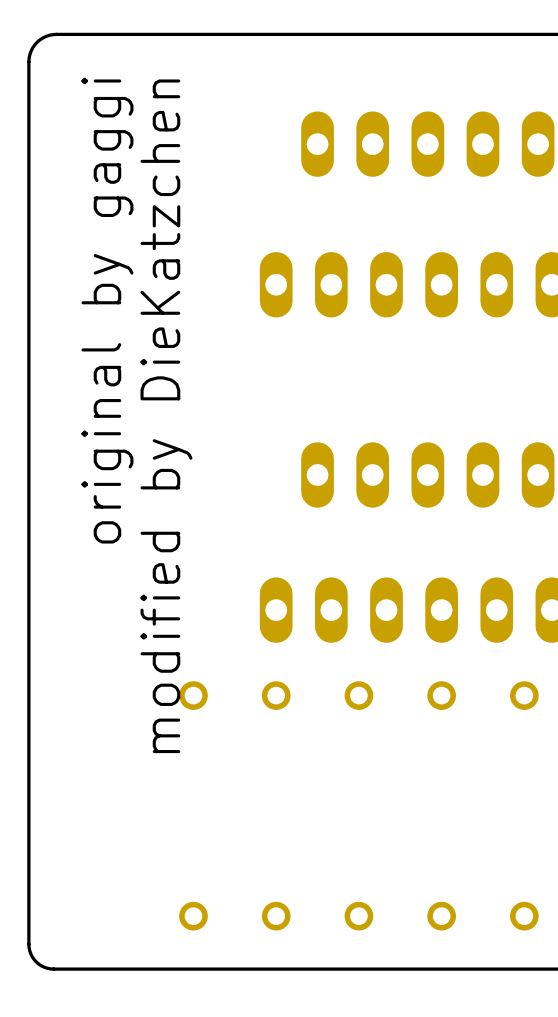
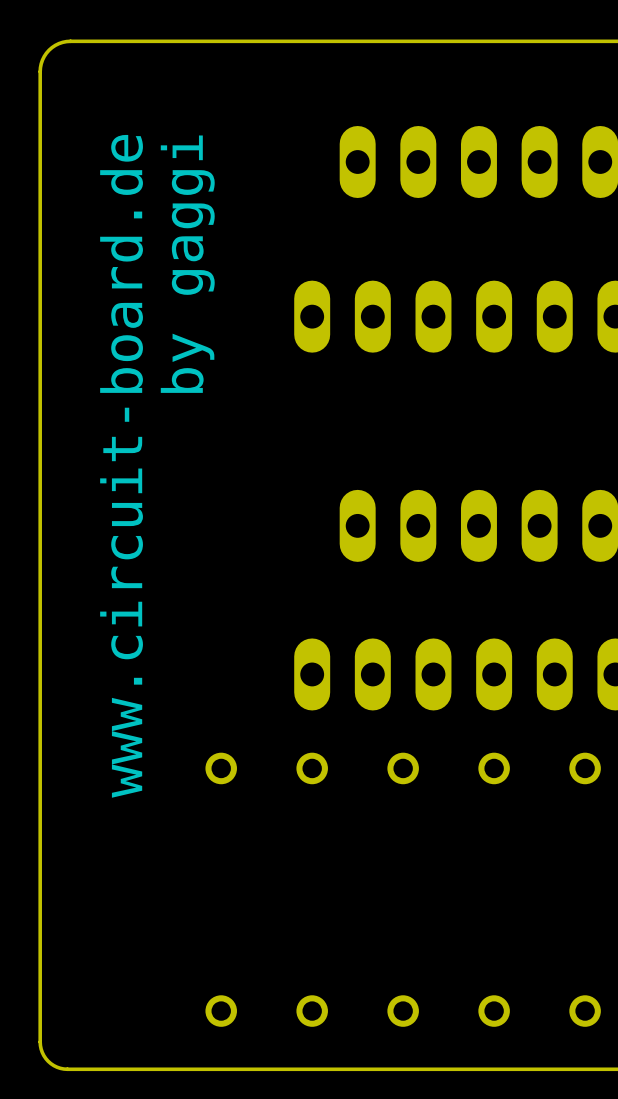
text: original by gaggi (107, 310) -> by gaggi (187, 264)
text: none -> www.circuit-board.de (121, 466)
text: modified by DieKatzchen (166, 416) -> none

